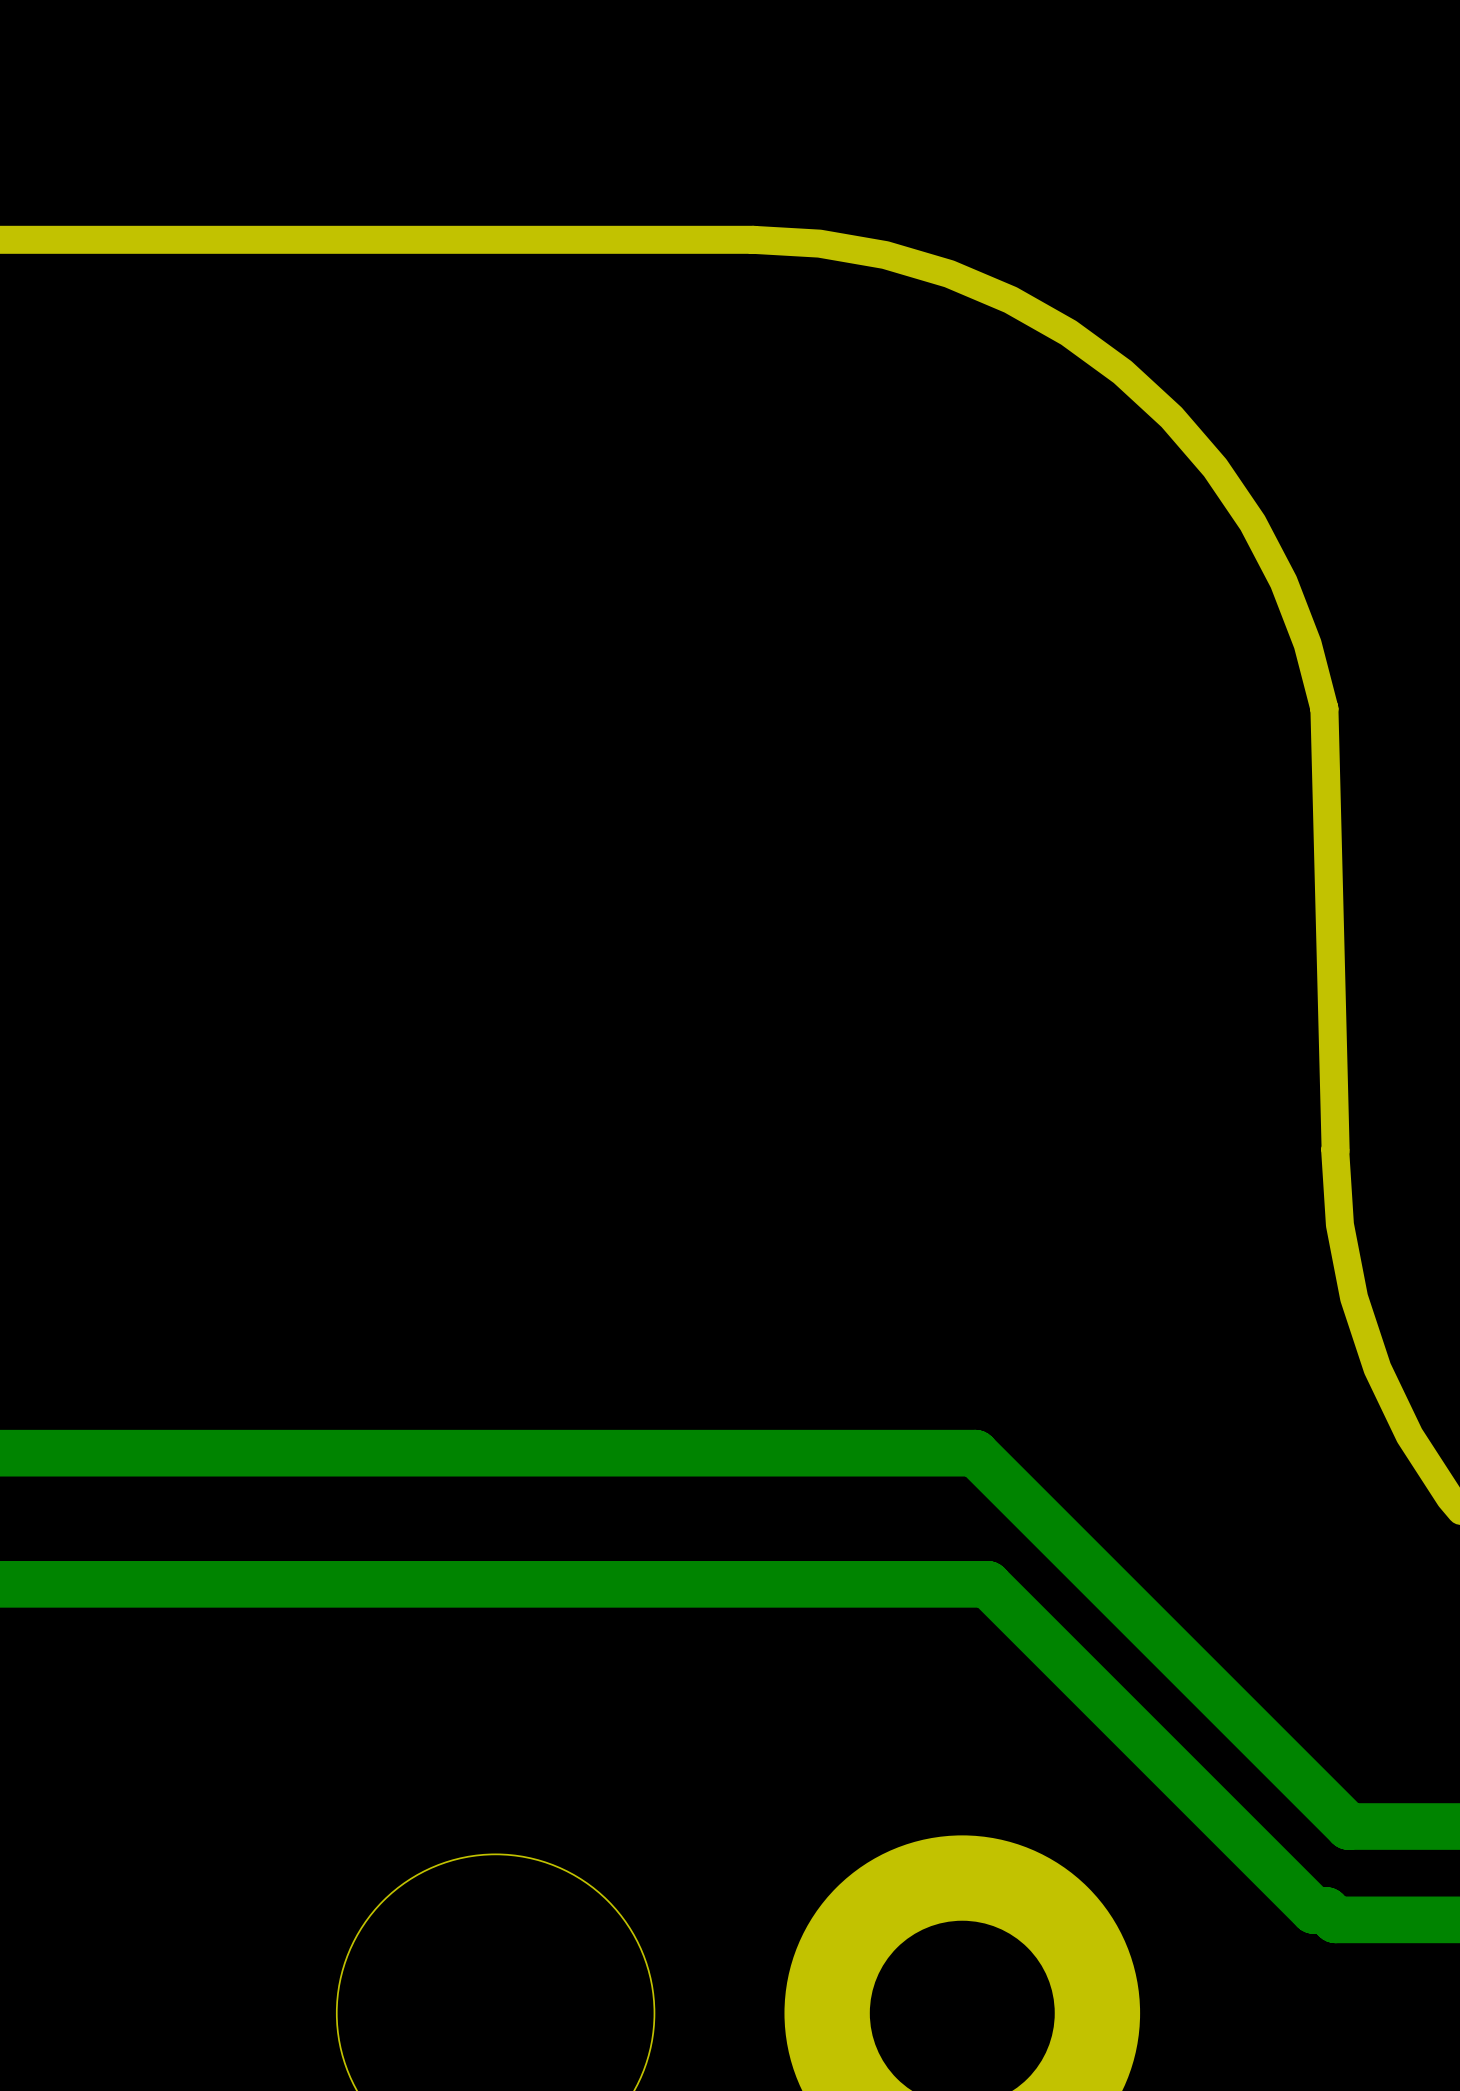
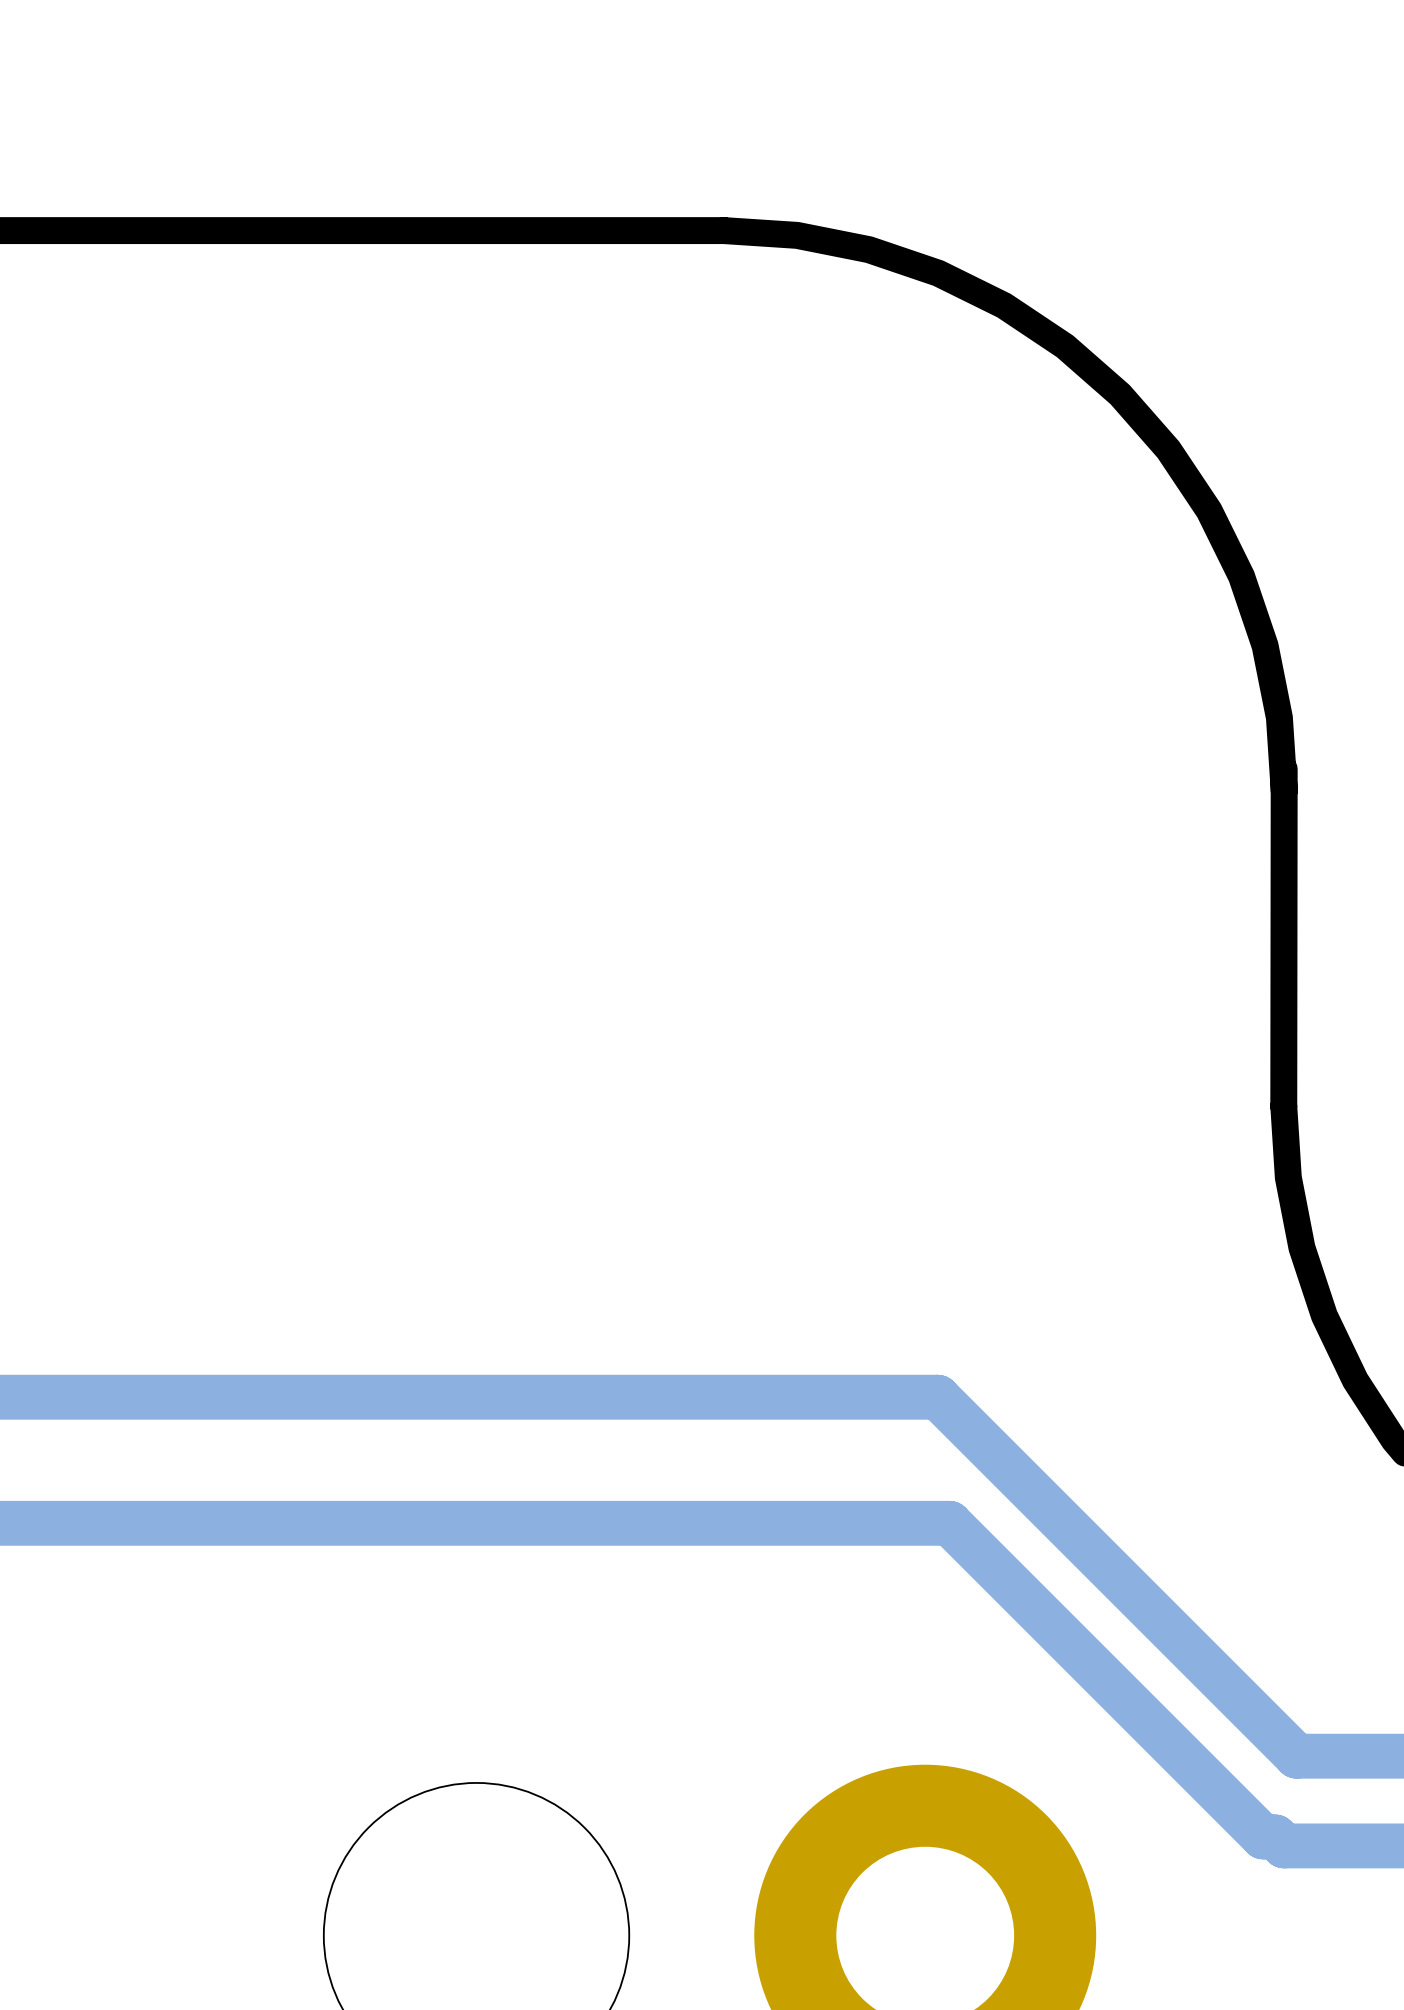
board edge: (752, 239) (819, 243) (885, 255) (949, 273) (1010, 299) (1068, 332) (1122, 372) (1171, 417) (1215, 467) (1252, 522) (1283, 581) (1307, 644) (1324, 708) (1335, 1149) -> (723, 230) (797, 235) (868, 249) (938, 273) (1004, 305) (1065, 346) (1120, 394) (1168, 449) (1209, 510) (1241, 576) (1265, 645) (1279, 717) (1284, 790)
board edge: none -> (1284, 769) (1283, 1106)

